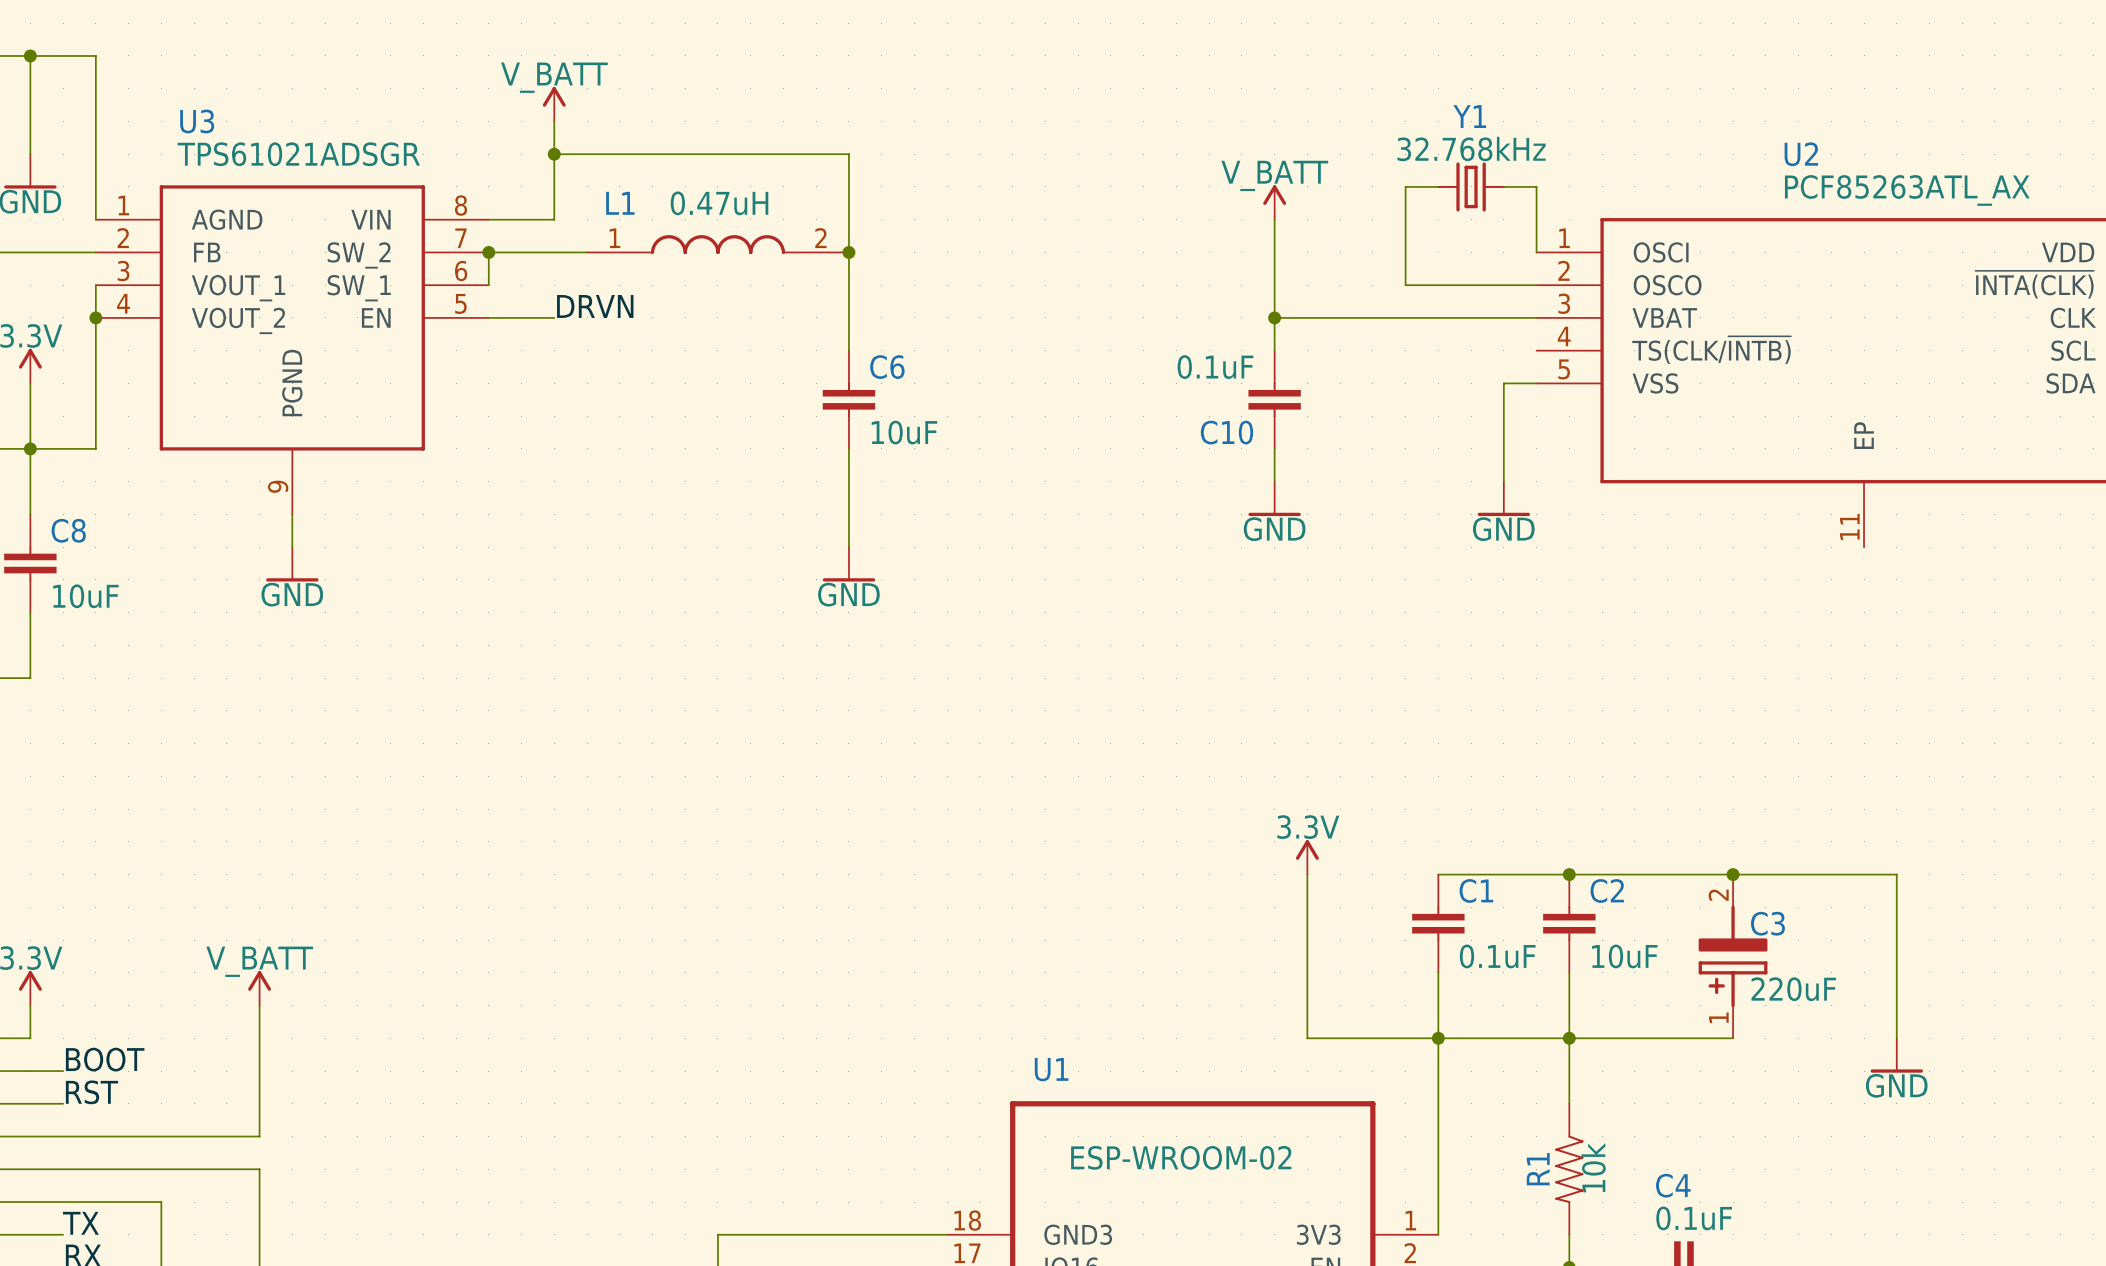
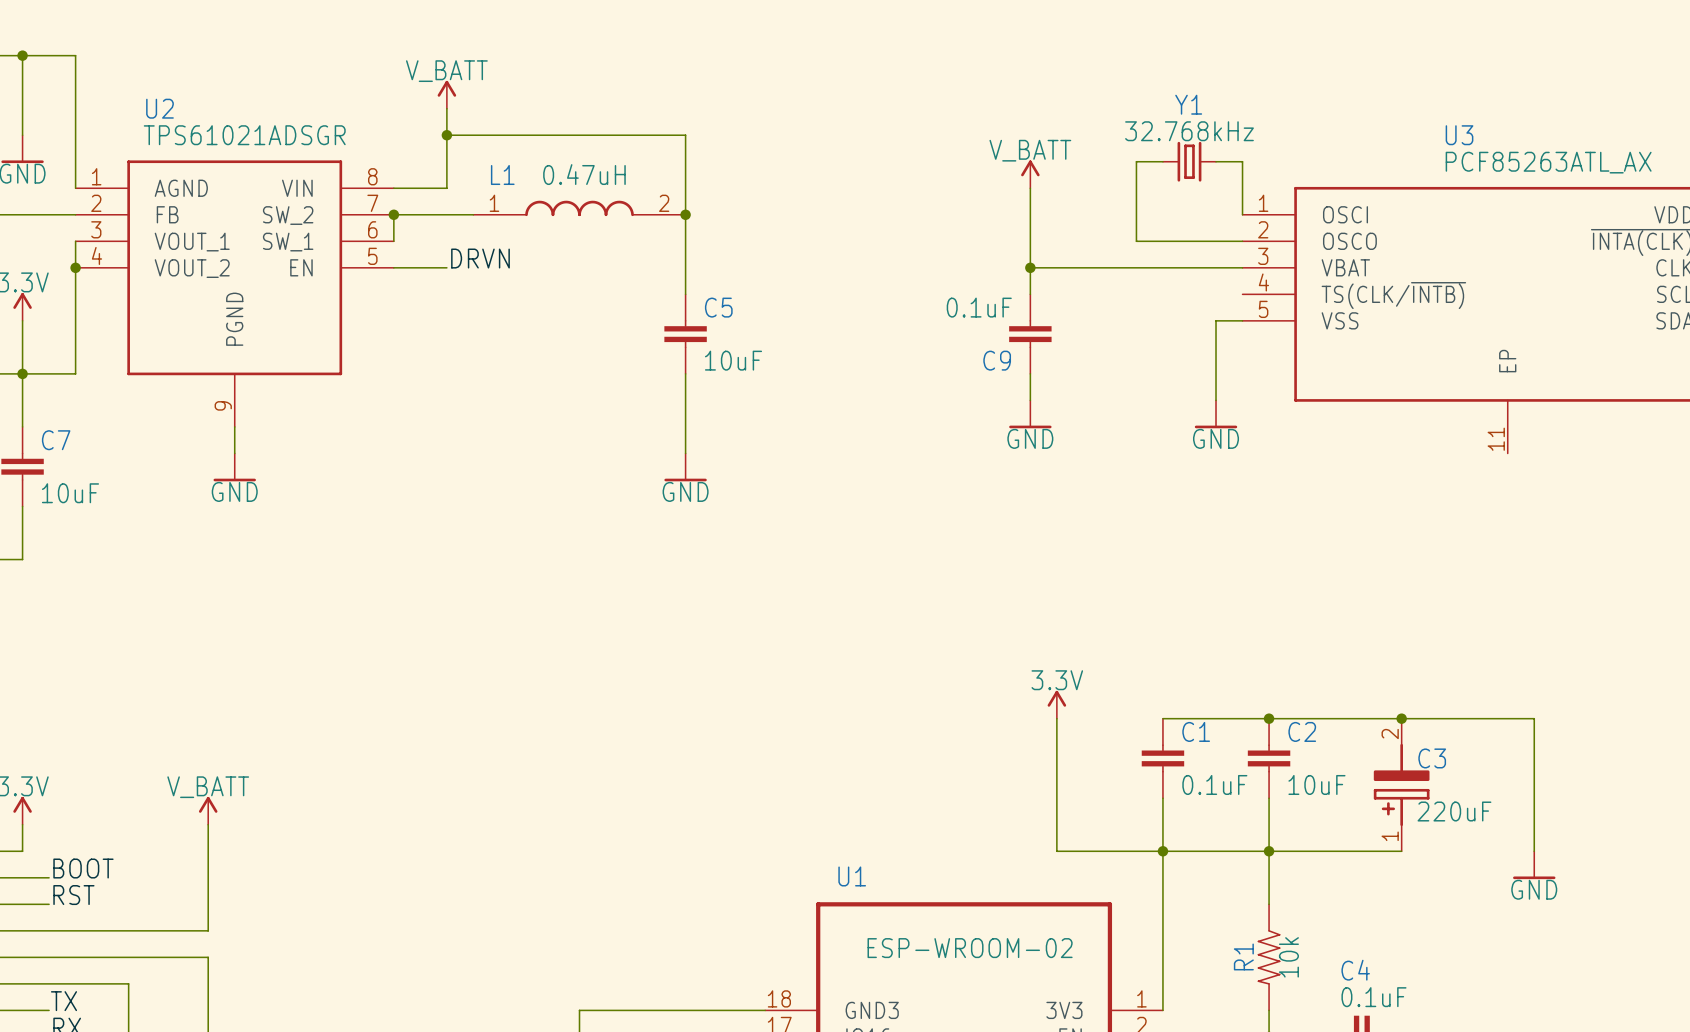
U3 name: U3 (197, 121) -> U2 (159, 108)
U2 name: U2 (1801, 154) -> U3 (1459, 135)
C6 name: C6 (887, 367) -> C5 (718, 307)
C10 name: C10 (1226, 432) -> C9 (997, 360)
C8 name: C8 (68, 530) -> C7 (56, 440)

